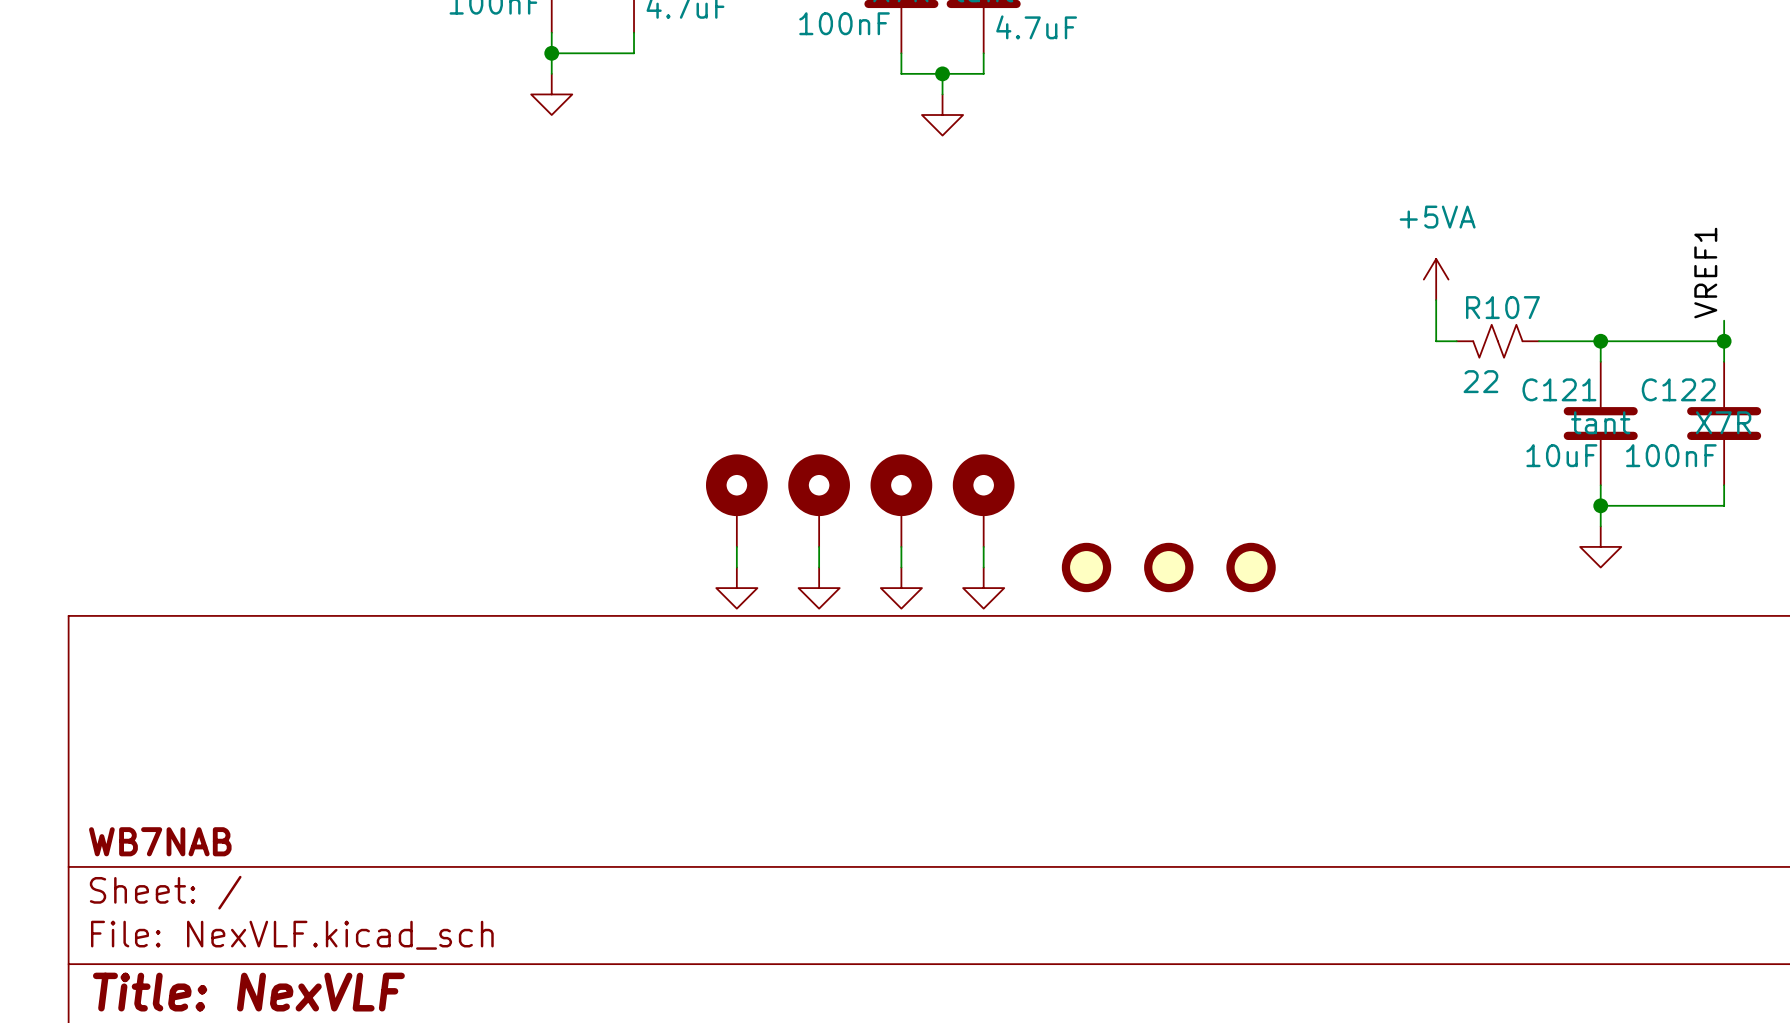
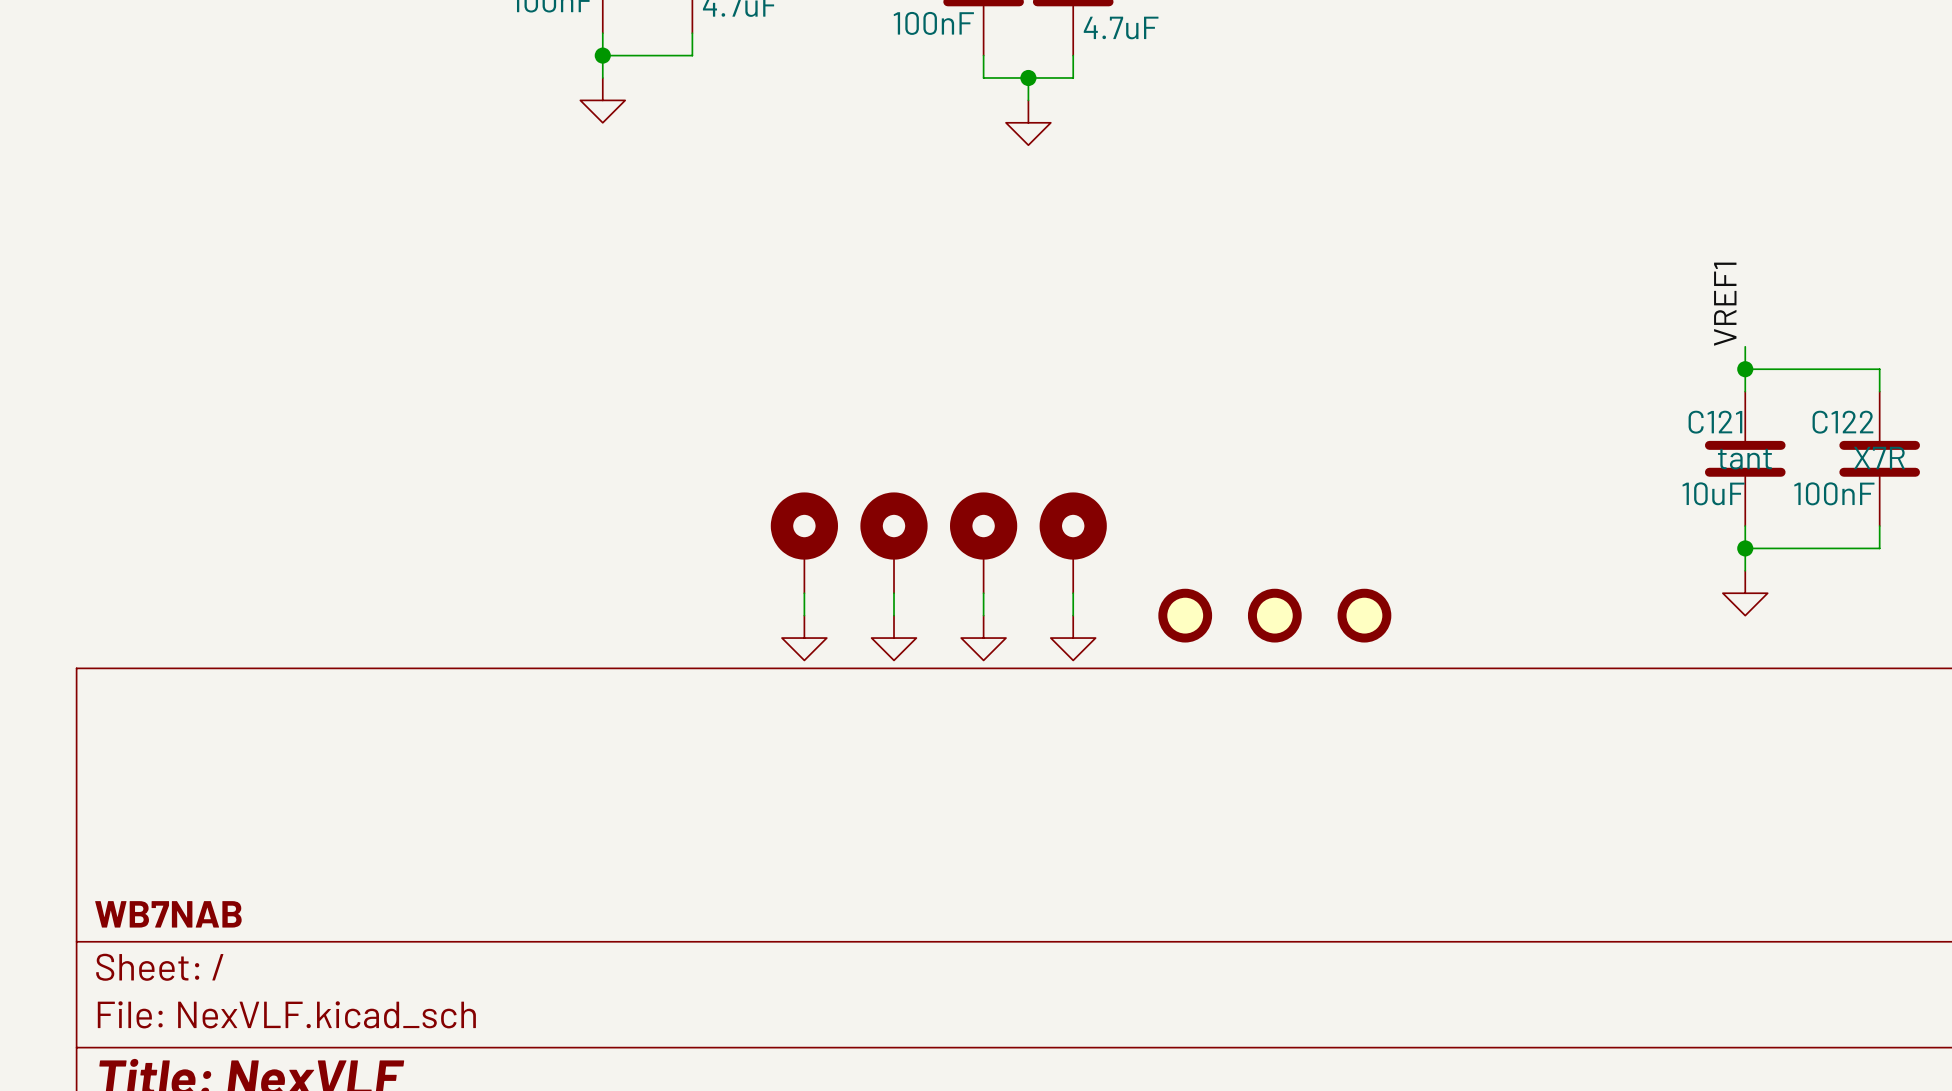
label position: VREF1 (1705, 273) -> VREF1 (1725, 304)
power symbol: +5VA (1436, 279) -> none
wire: (1436, 300) (1436, 341) (1456, 341) -> none
wire: (1724, 320) (1724, 341) -> none
R107: 22 (1497, 341) -> none
wire: (1539, 341) (1600, 341) -> (1745, 346) (1745, 369)
junction: (1724, 341) -> none

